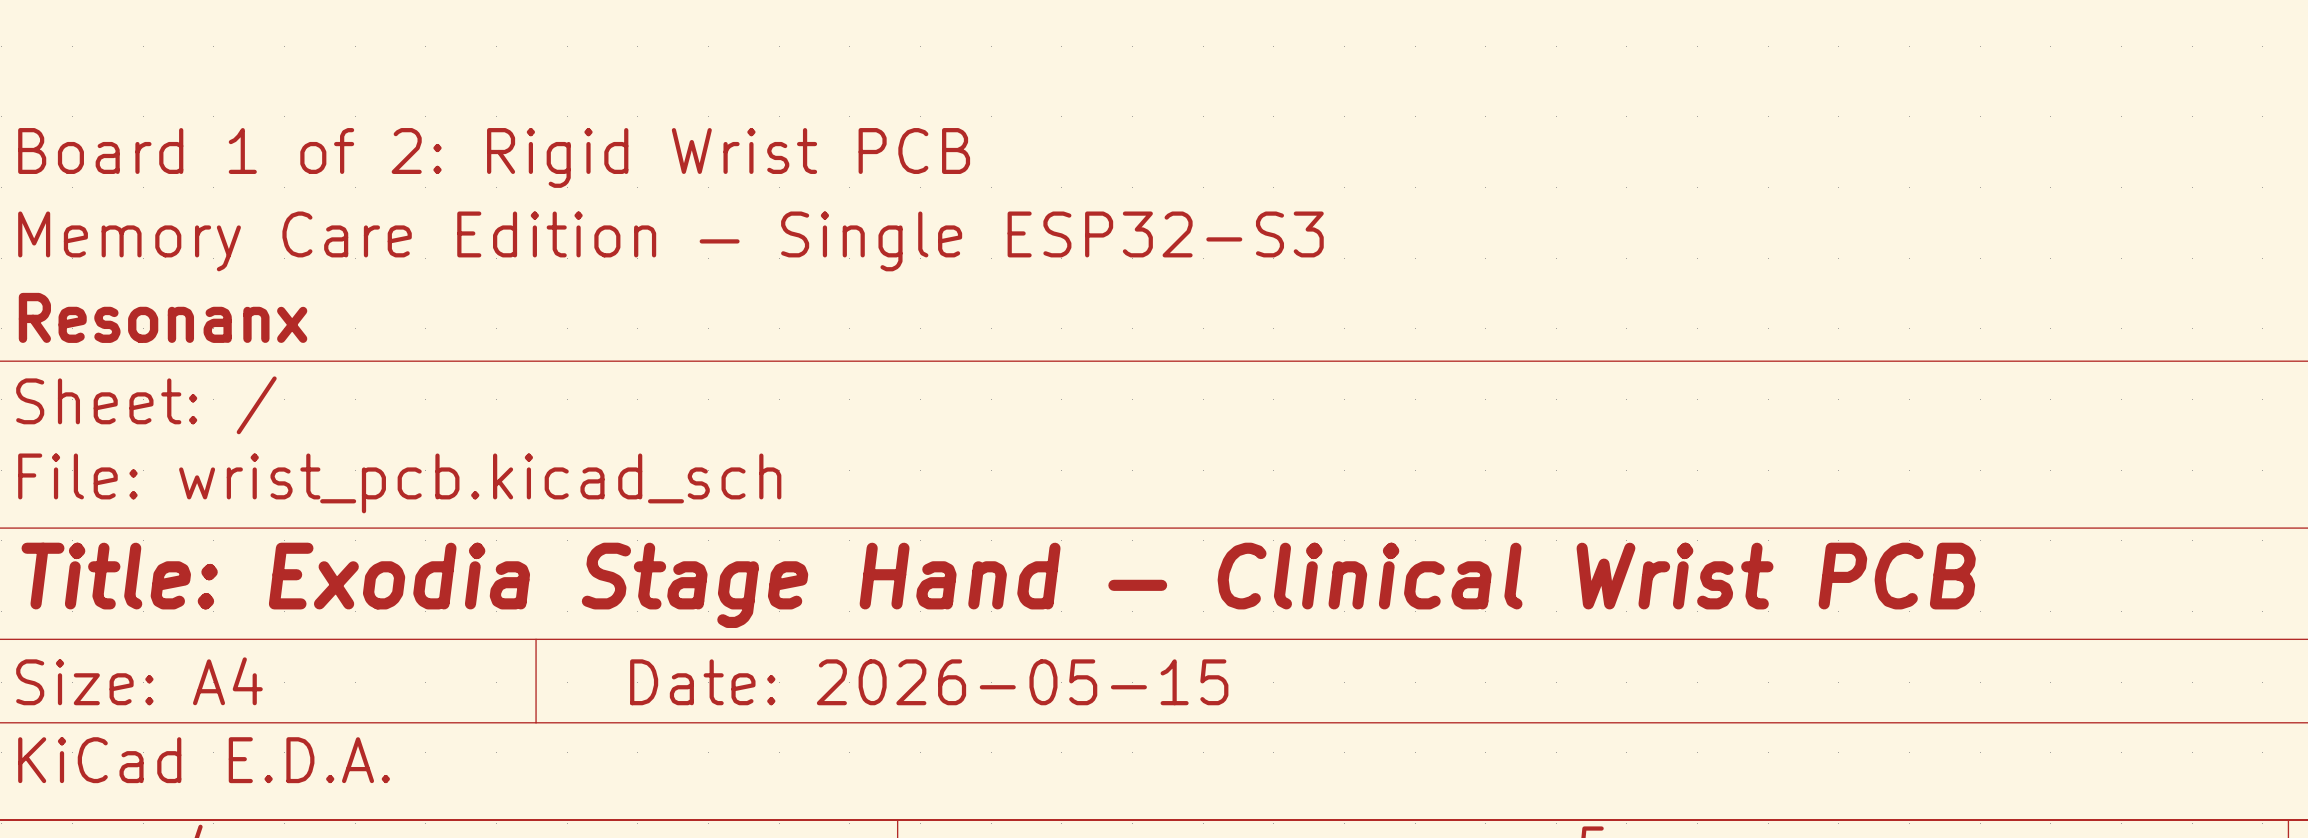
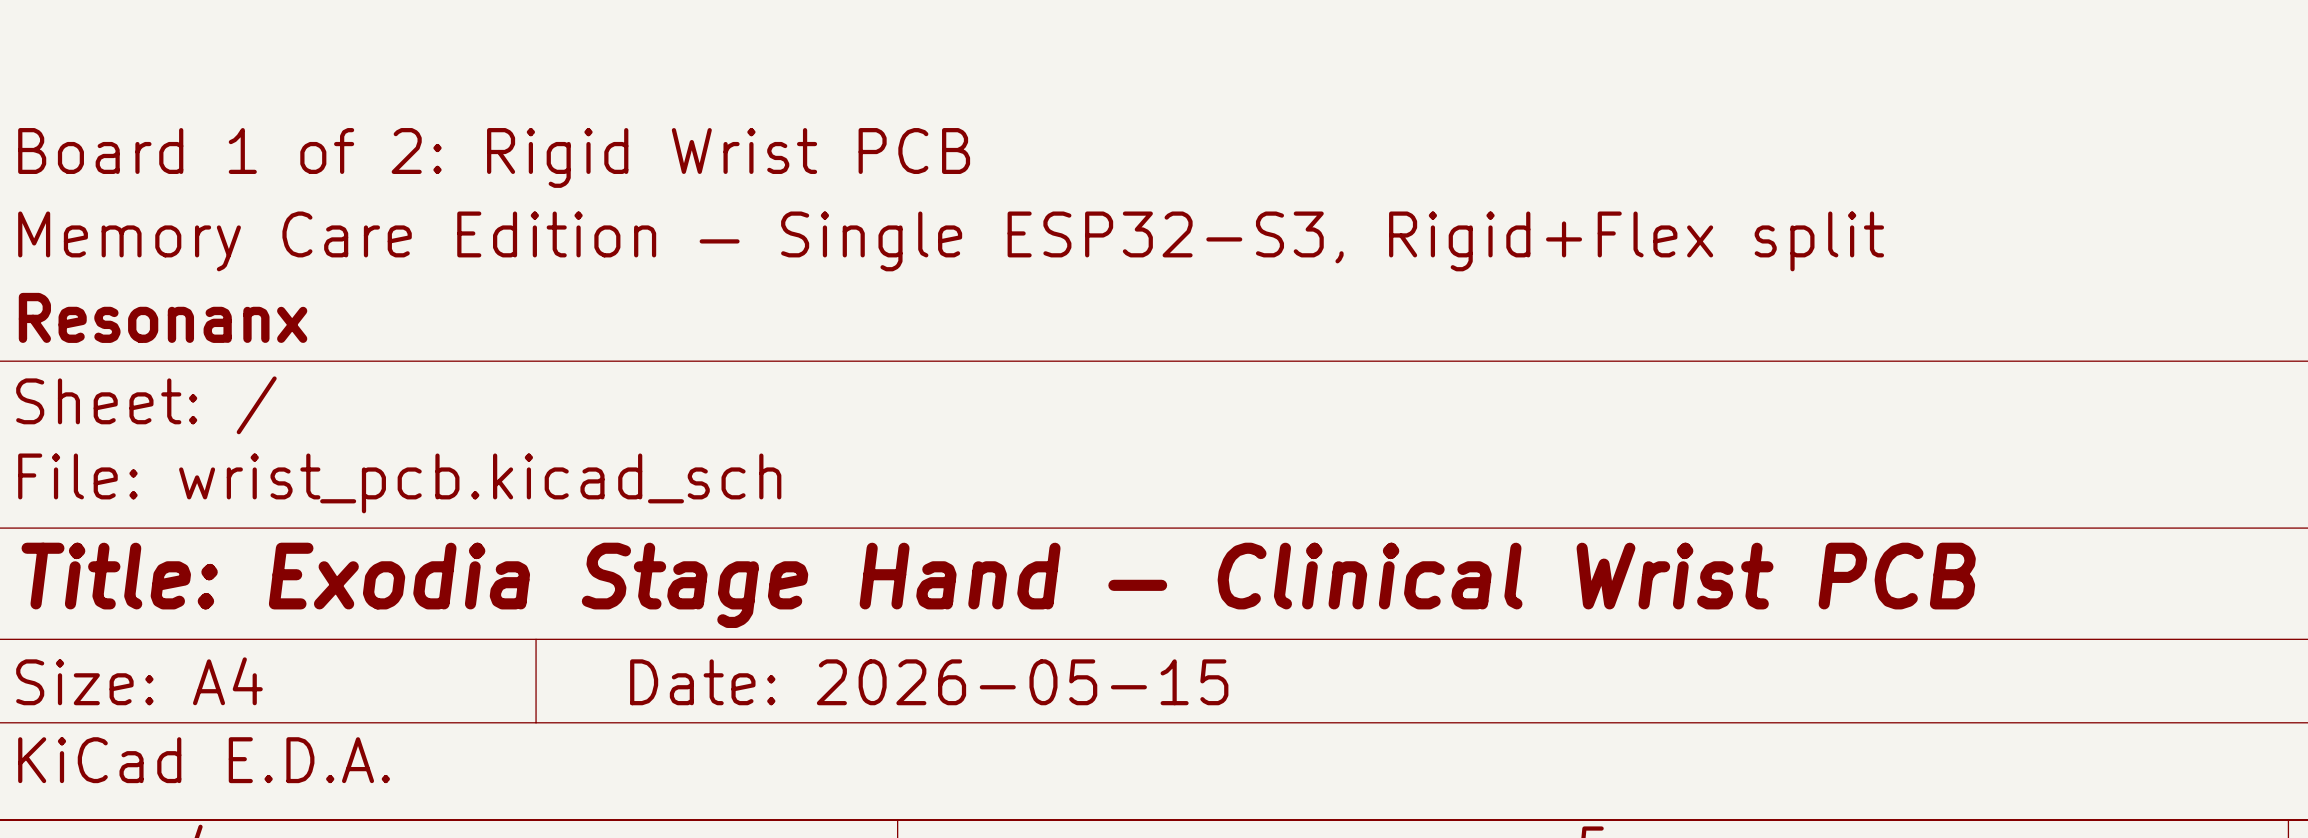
title block: Memory Care Edition — Single ESP32-S3 (670, 241) -> Memory Care Edition — Single ESP32-S3, Rigid+Flex split (951, 241)

